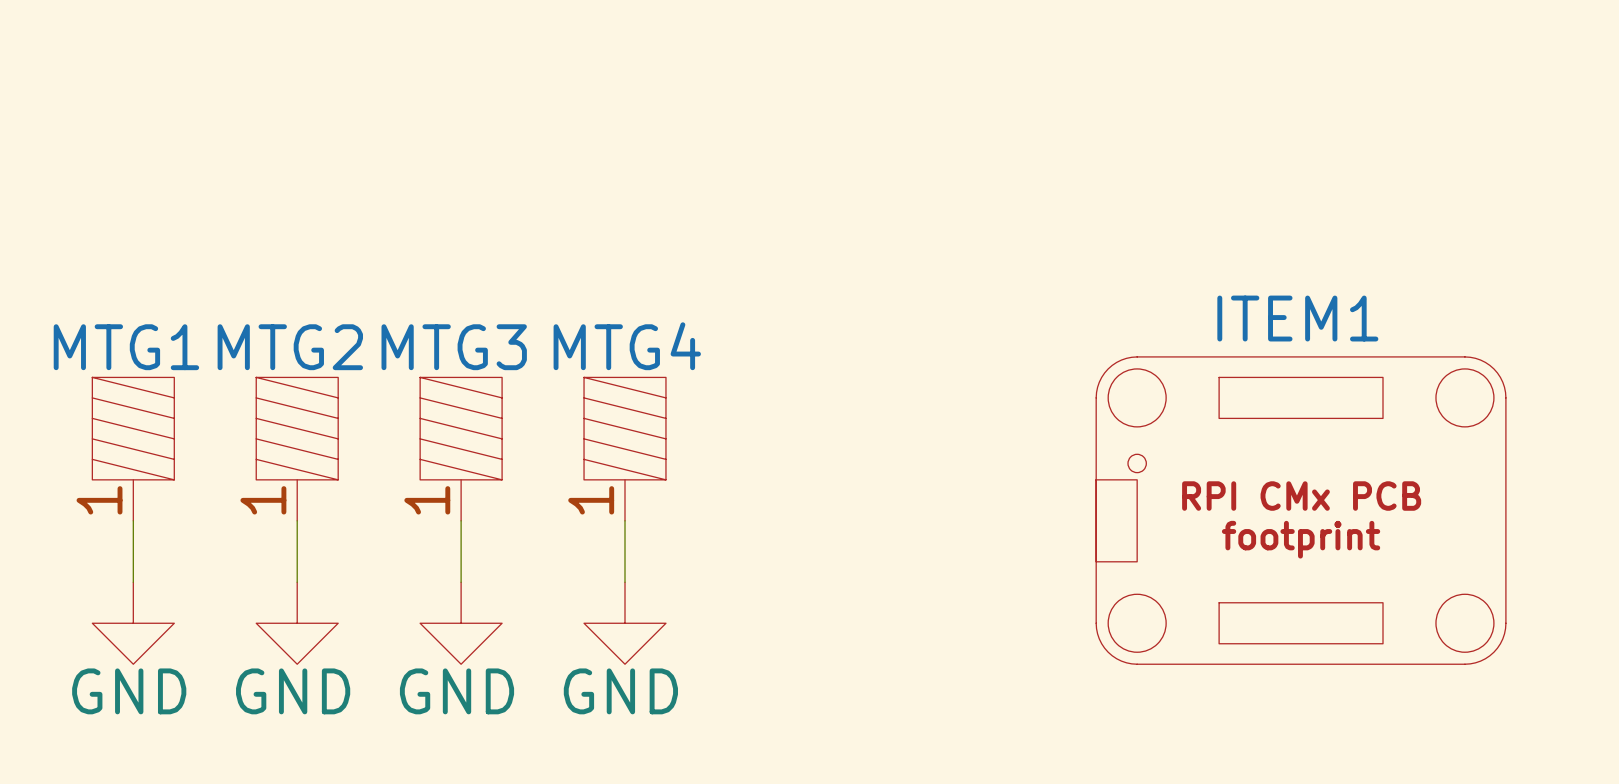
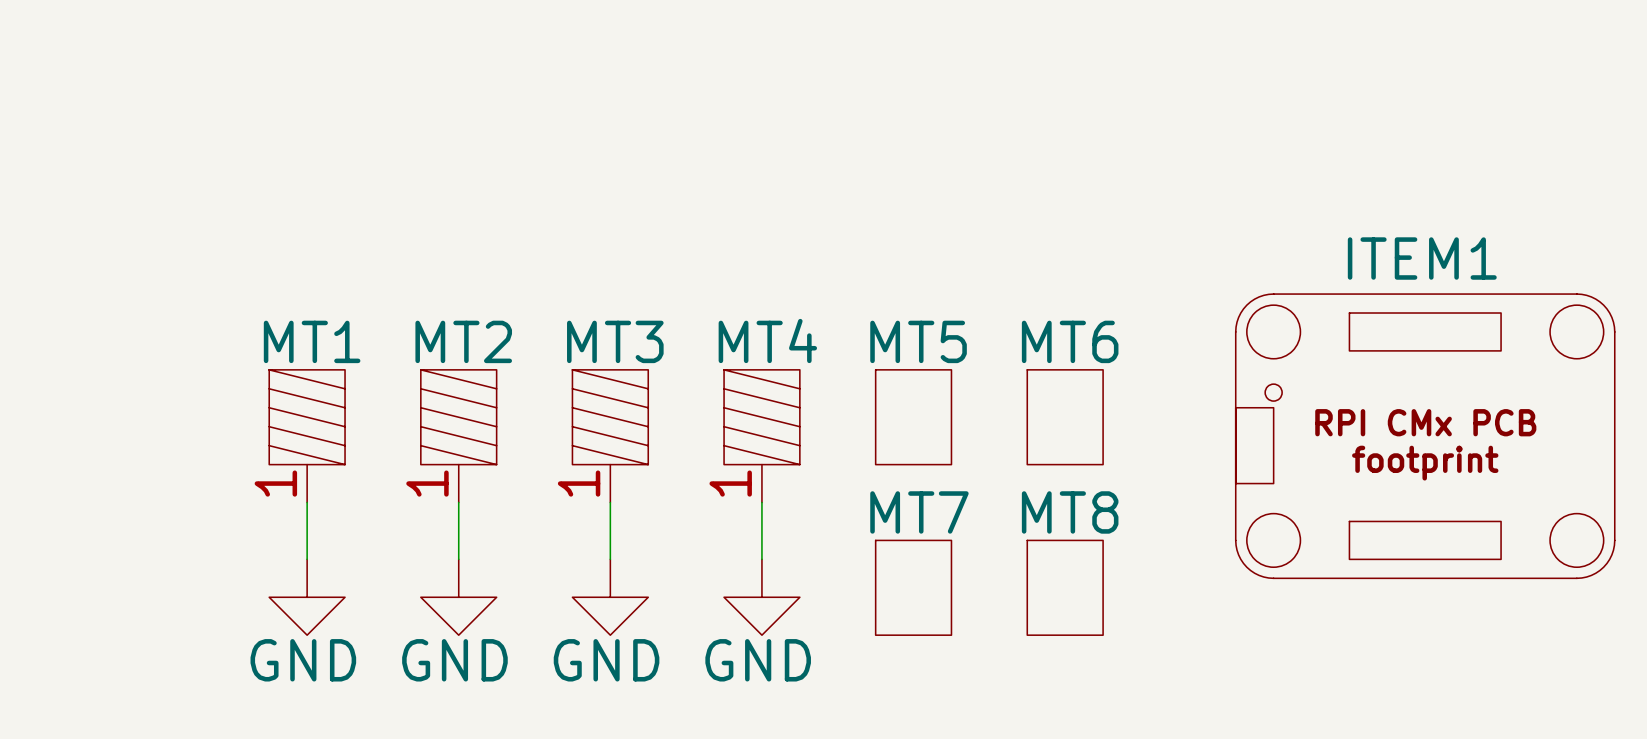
MTG4 name: MTG4 (627, 346) -> MT4 (767, 341)
MTG1 name: MTG1 (126, 347) -> MT1 (312, 341)
MTG2 name: MTG2 (290, 347) -> MT2 (463, 341)
MTG3 name: MTG3 (454, 347) -> MT3 (615, 341)
MT5: none -> (913, 417)
MT6: none -> (1065, 417)
ITEM1 position: (1301, 510) -> (1425, 436)
MT7: none -> (913, 587)
MT8: none -> (1065, 587)

